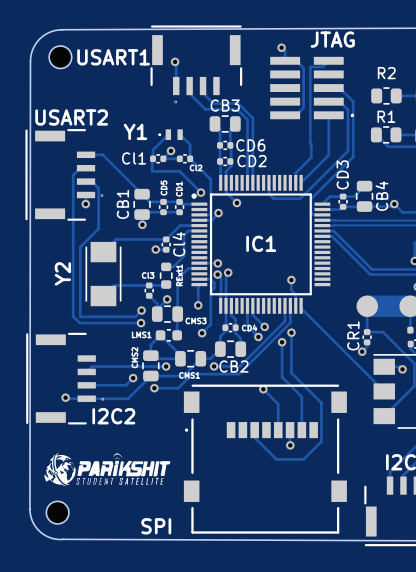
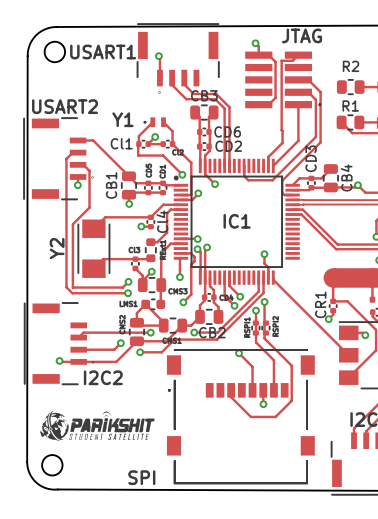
part: none -> (255, 328)
part: none -> (265, 328)

